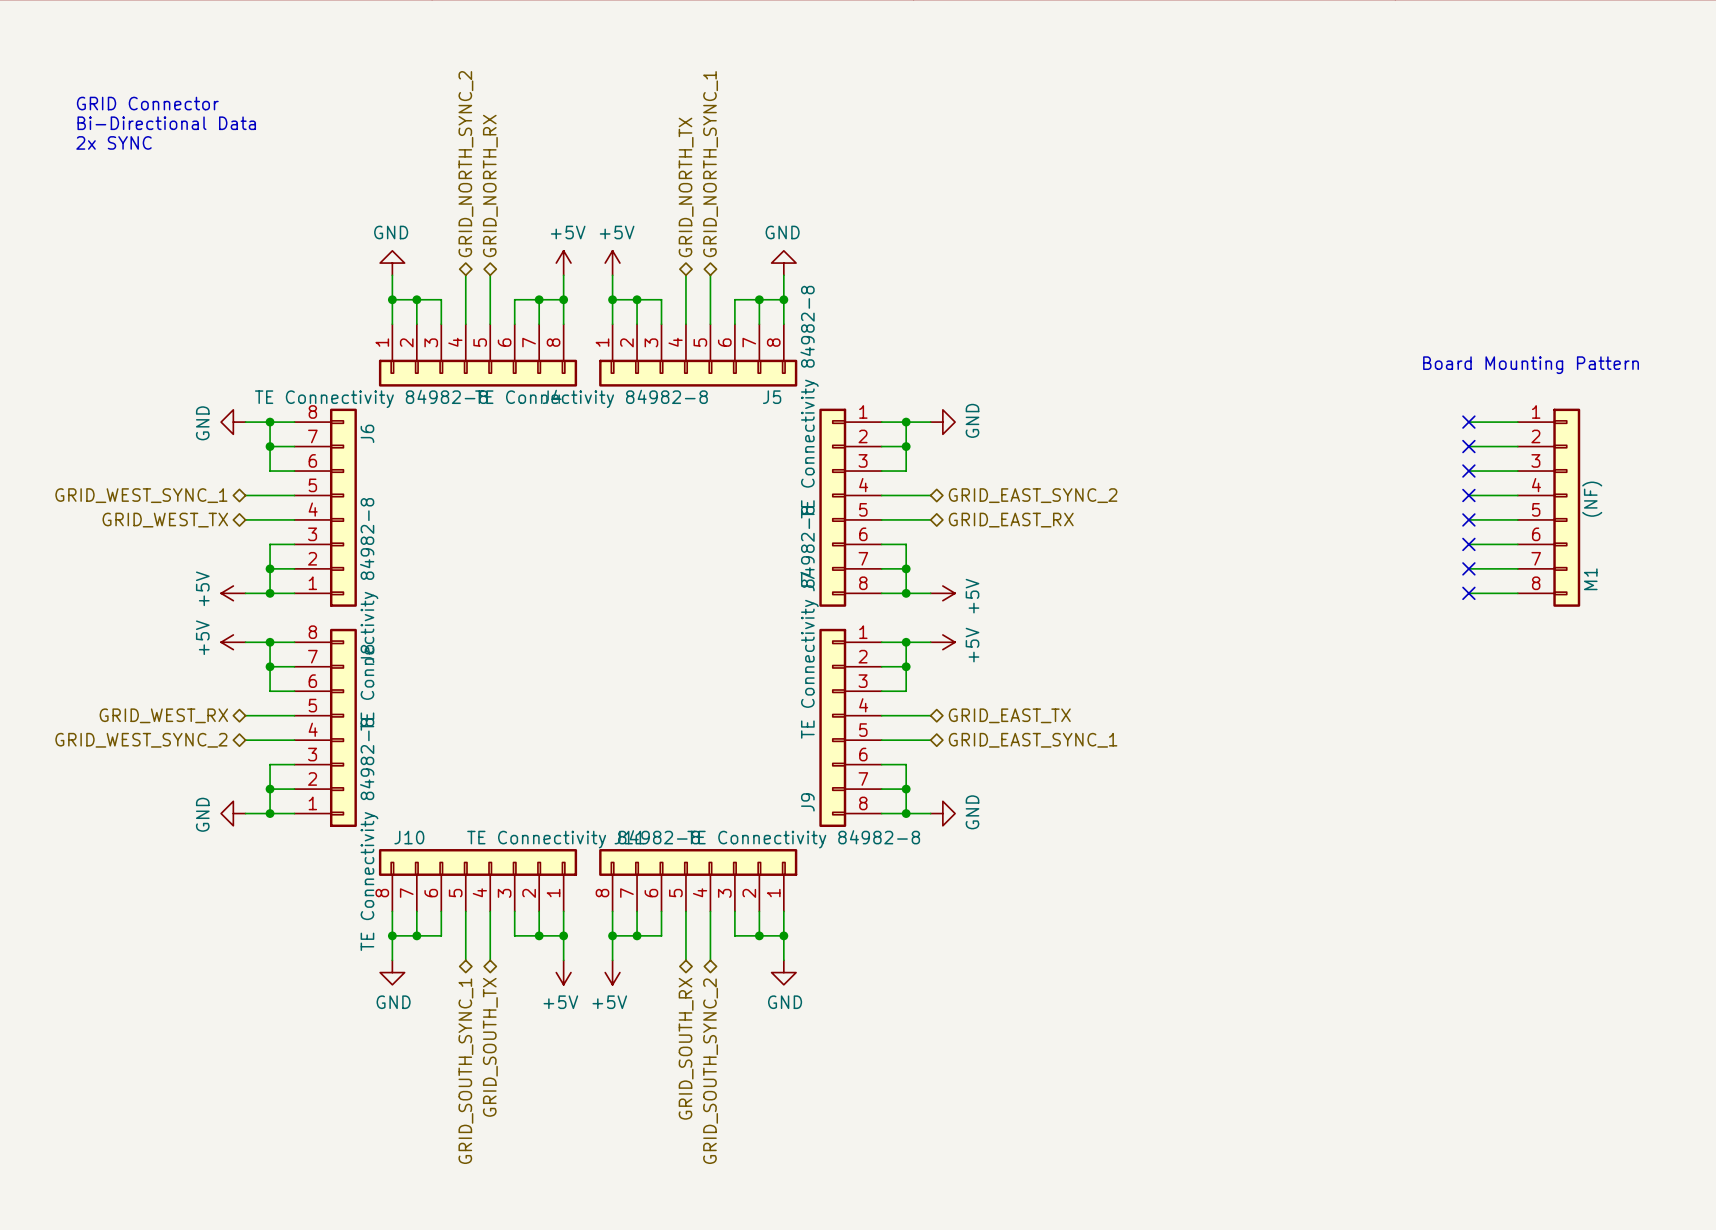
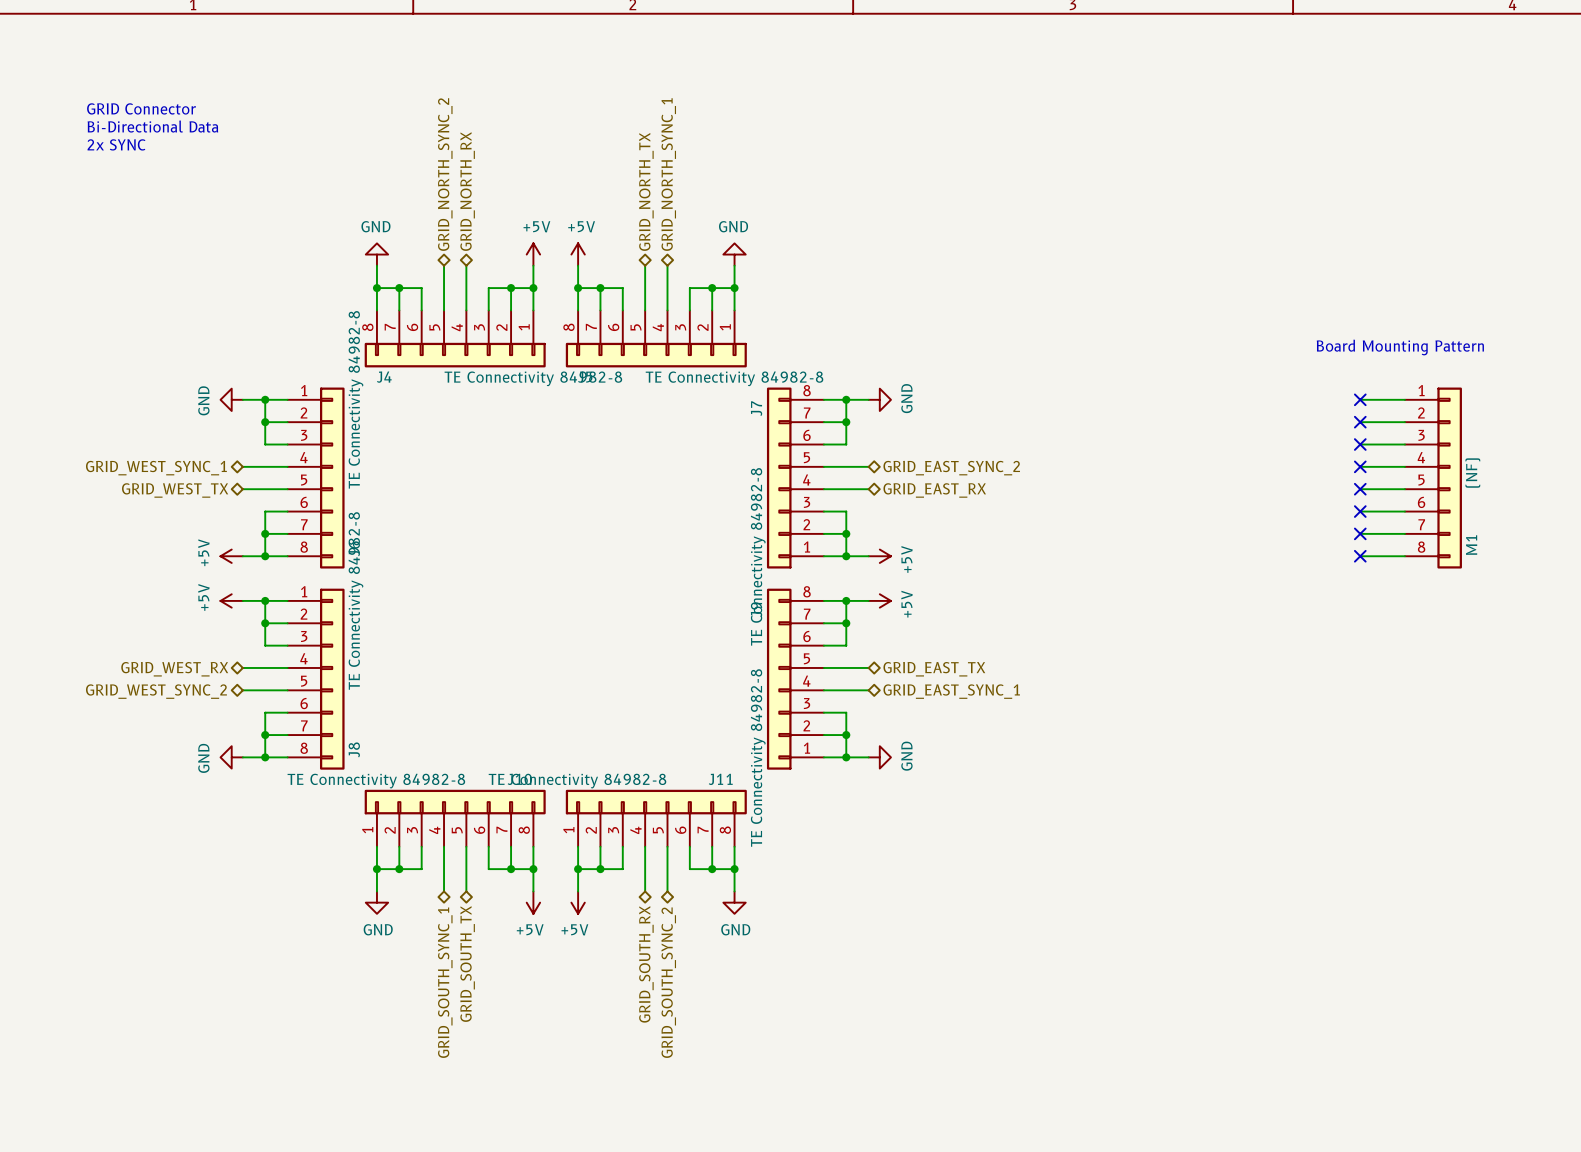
J4 flip: as is (478, 373) -> left-right (455, 355)
J5 flip: as is (698, 373) -> left-right (656, 355)
J6 flip: as is (343, 507) -> up-down (332, 478)
J7 flip: as is (832, 507) -> up-down (779, 478)
J8 flip: as is (343, 727) -> up-down (332, 679)
J9 flip: as is (832, 727) -> up-down (779, 679)
J10 flip: as is (478, 862) -> left-right (455, 802)
J11 flip: as is (698, 862) -> left-right (656, 802)

